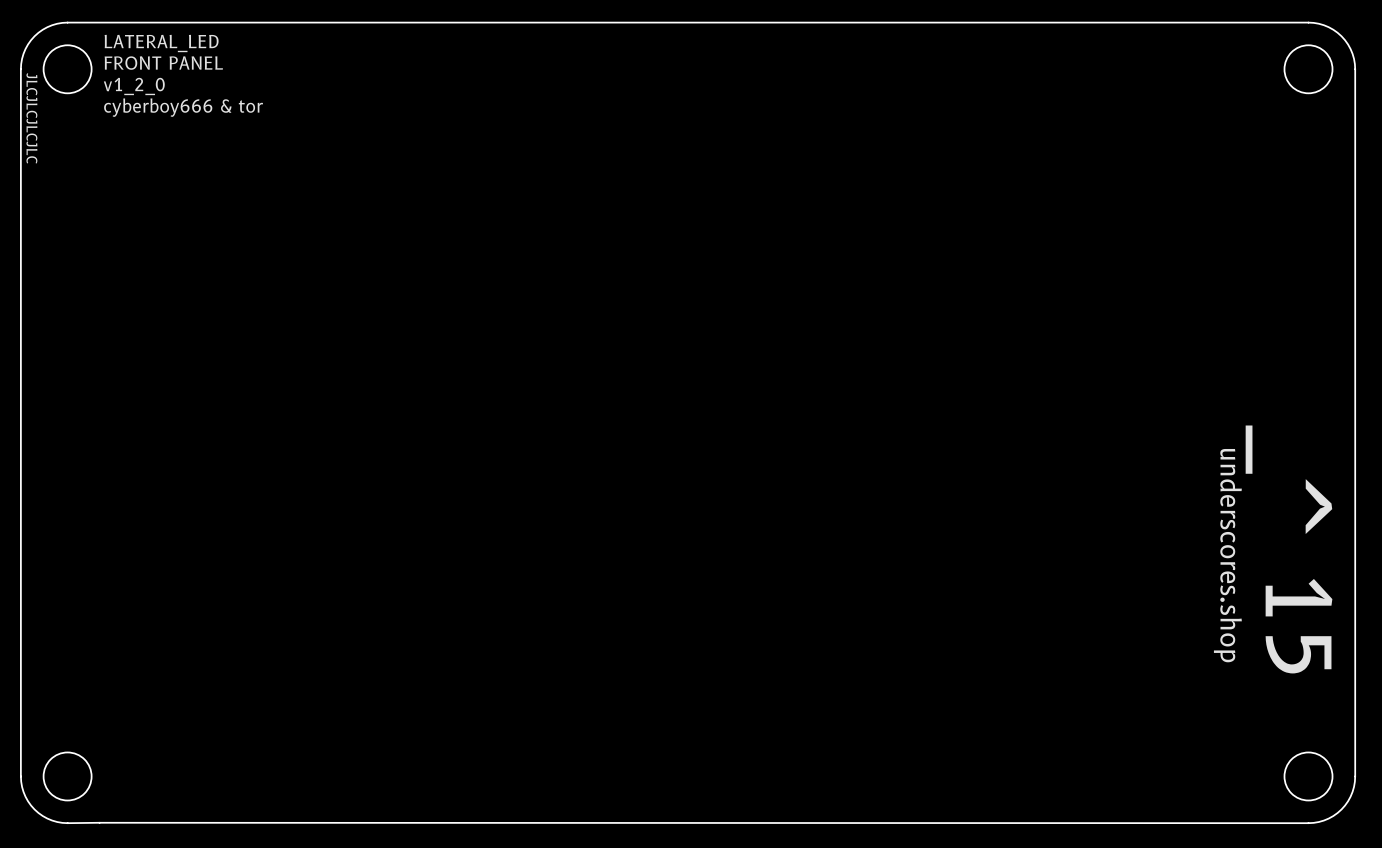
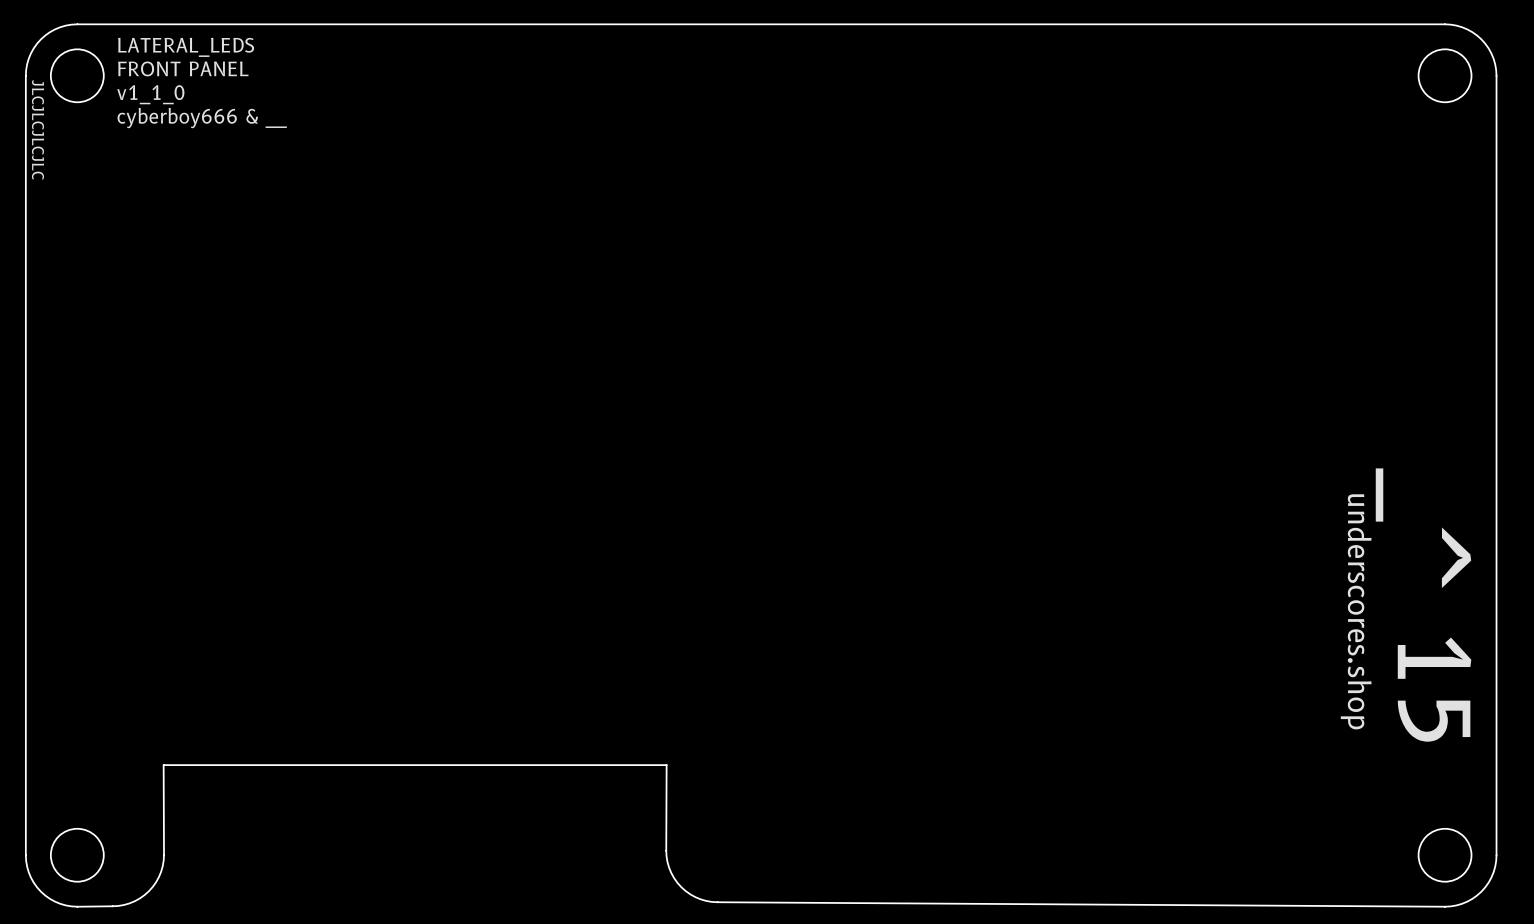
text: LATERAL_LED (161, 43) -> LATERAL_LEDS (186, 47)
text: v1_2_0 (134, 86) -> v1_1_0 (150, 94)
text: cyberboy666 & tor (183, 107) -> cyberboy666 & __ (202, 118)
board edge: (99, 822) (1308, 823) -> (112, 906) (129, 903) (139, 898) (152, 886) (161, 871) (164, 854) (163, 765) (666, 765) (666, 850) (669, 867) (674, 878) (685, 891) (706, 900) (1445, 906)

